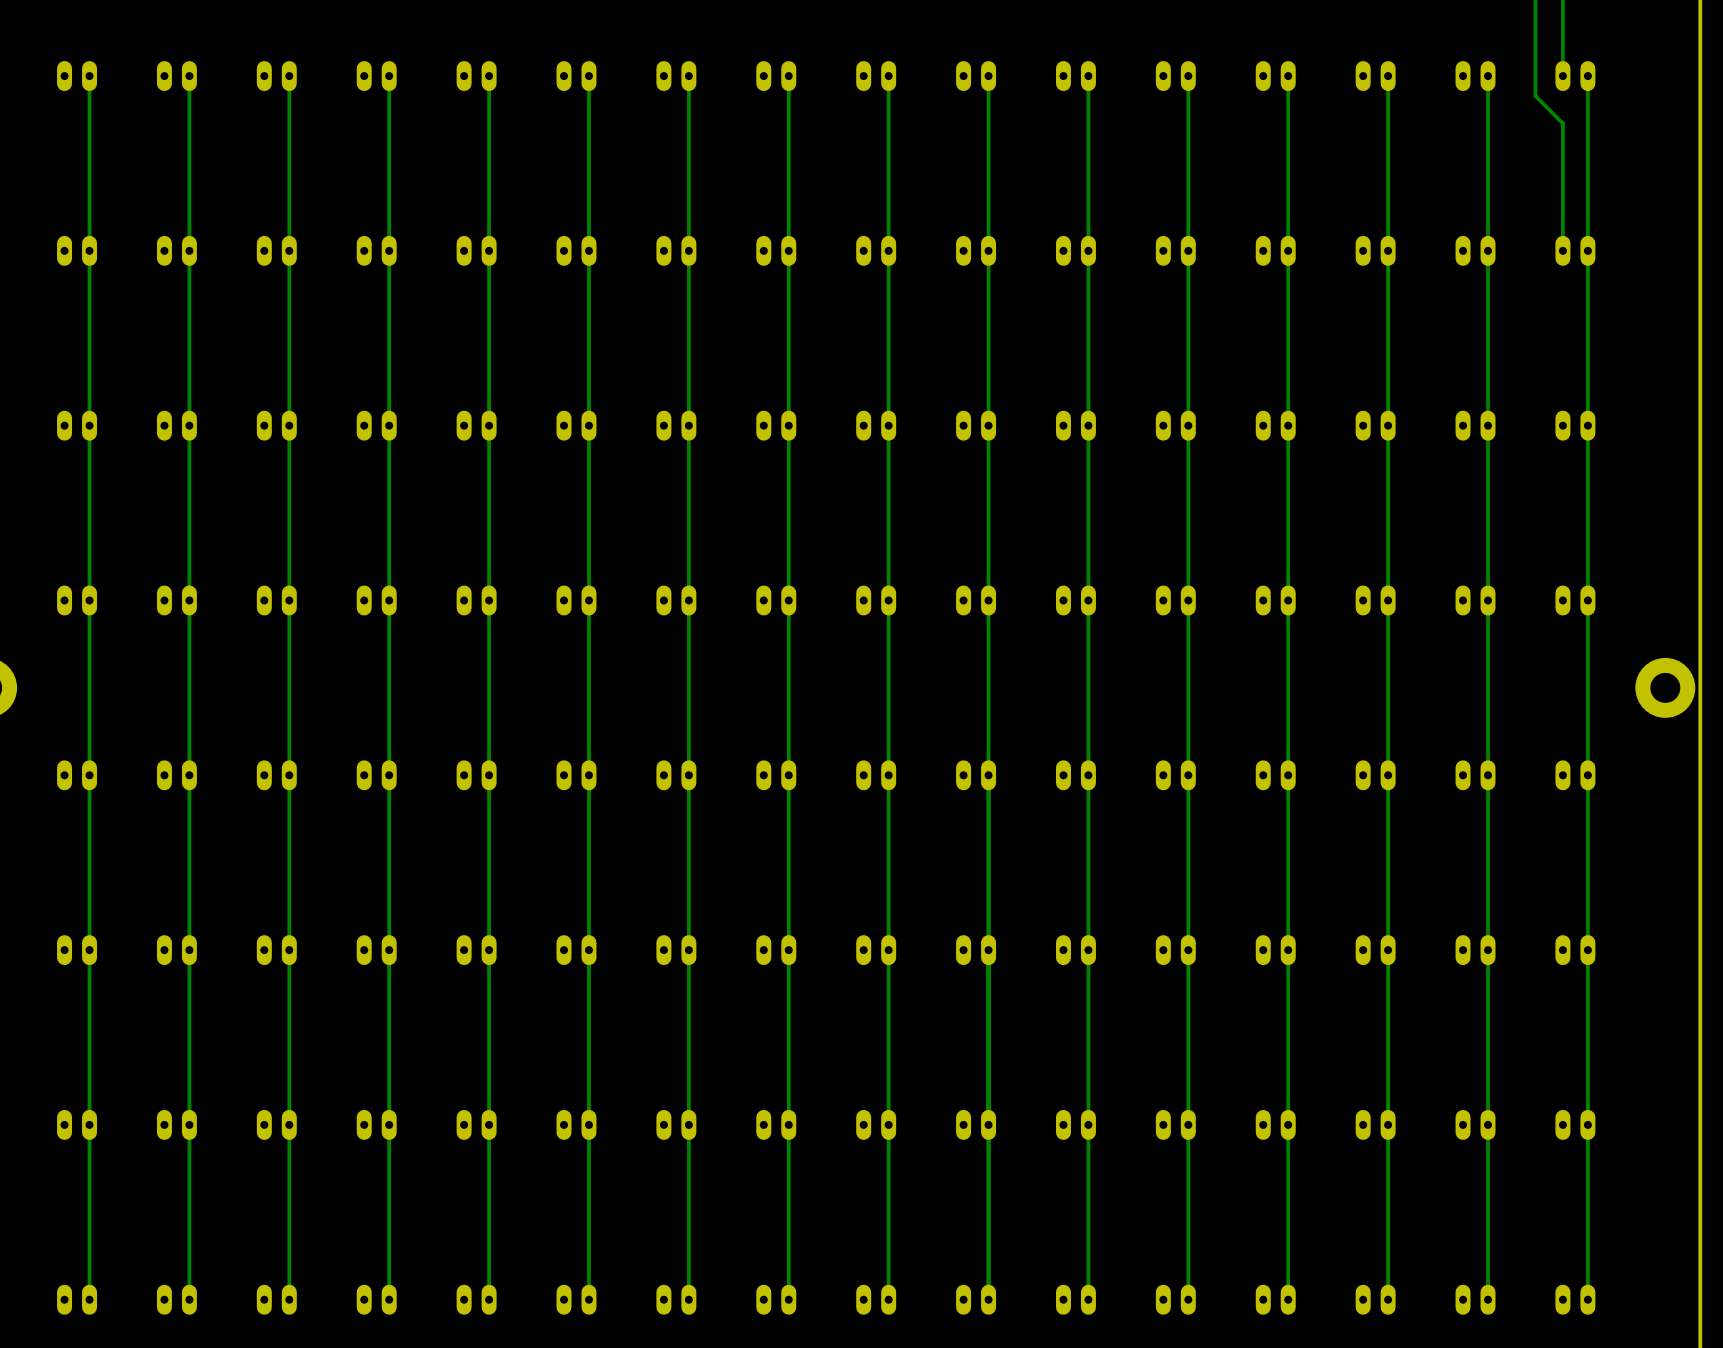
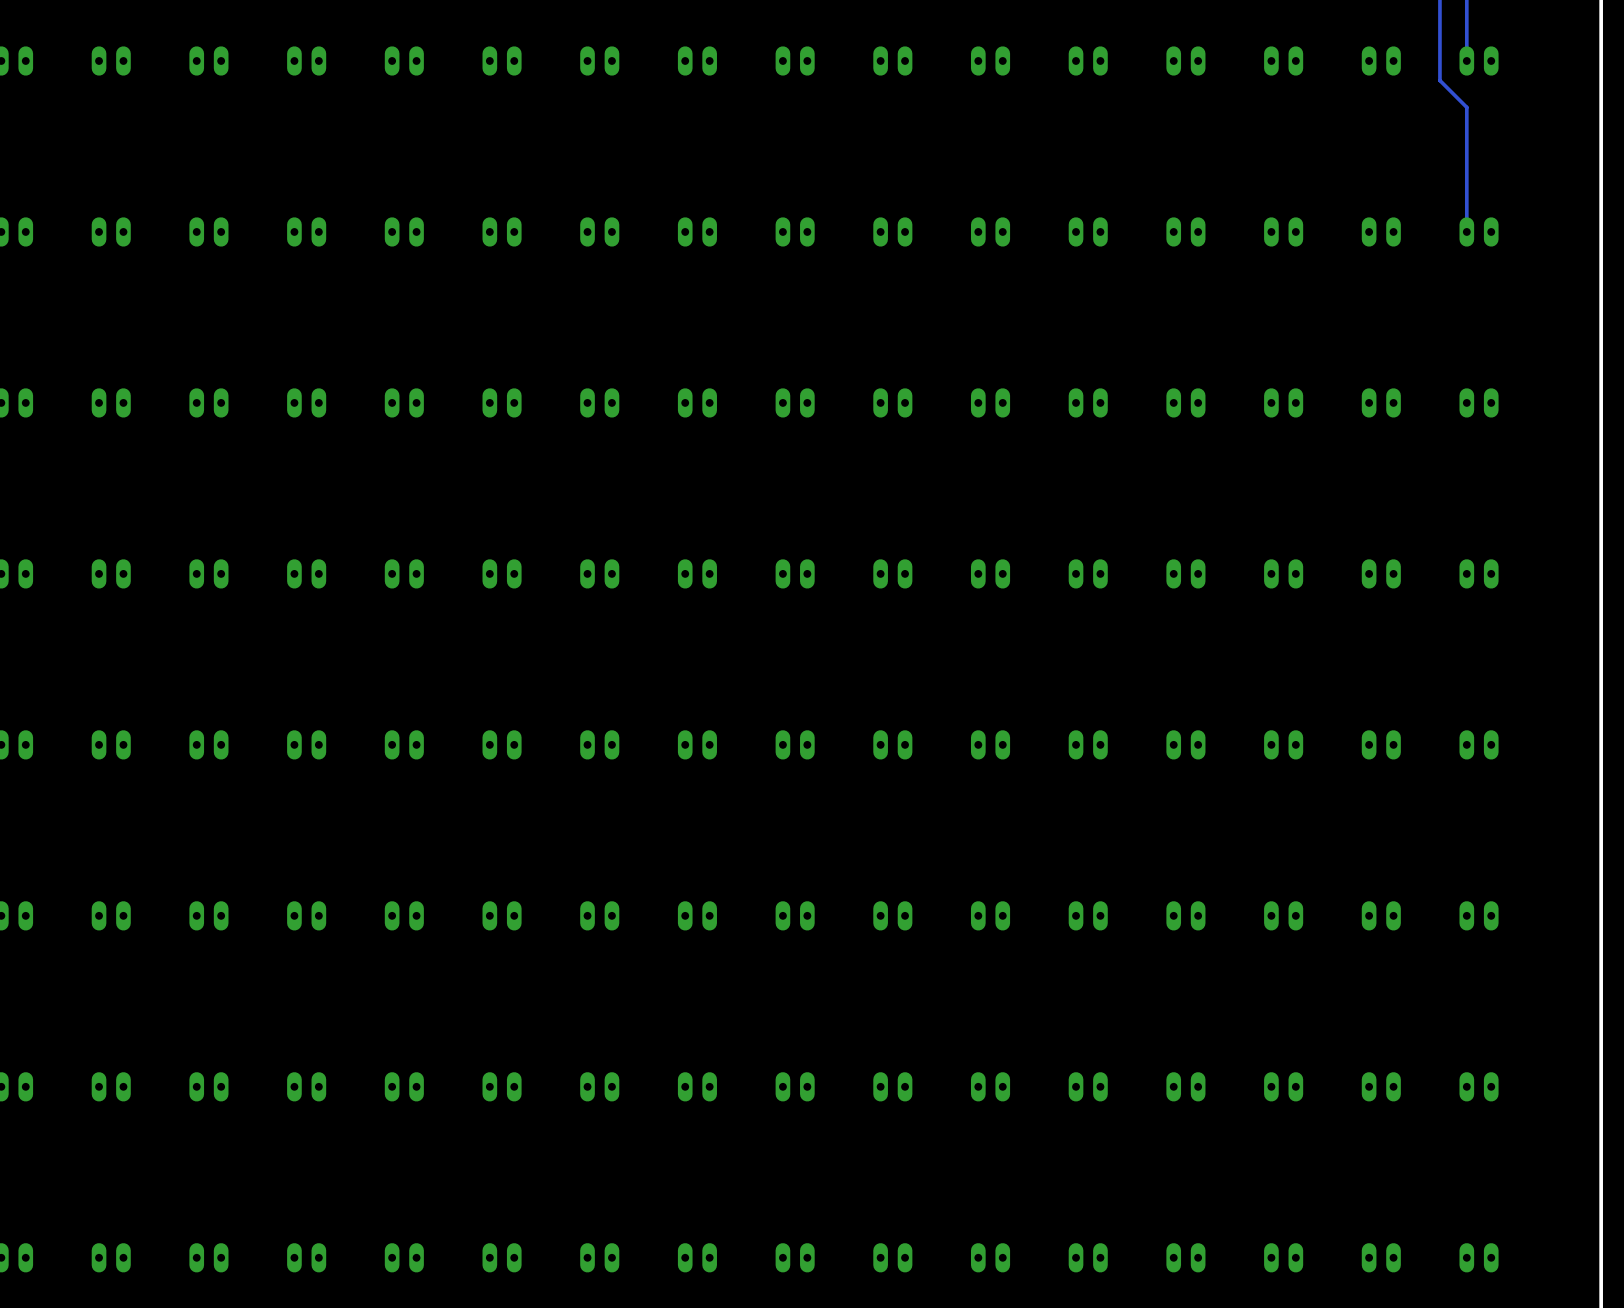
track: (89, 76) (89, 1299) -> none
track: (189, 76) (189, 1299) -> none
track: (289, 76) (289, 1299) -> none
track: (389, 76) (389, 1299) -> none
track: (489, 76) (489, 1299) -> none
track: (588, 76) (588, 1299) -> none
track: (688, 76) (688, 1299) -> none
track: (788, 76) (788, 1299) -> none
track: (888, 76) (888, 1299) -> none
track: (988, 76) (988, 1299) -> none
track: (1088, 76) (1088, 1299) -> none
track: (1188, 76) (1188, 1299) -> none
track: (1288, 76) (1288, 1299) -> none
track: (1388, 76) (1388, 1299) -> none
track: (1488, 76) (1488, 1299) -> none
track: (1587, 76) (1587, 1299) -> none
part: (1665, 687) -> none

